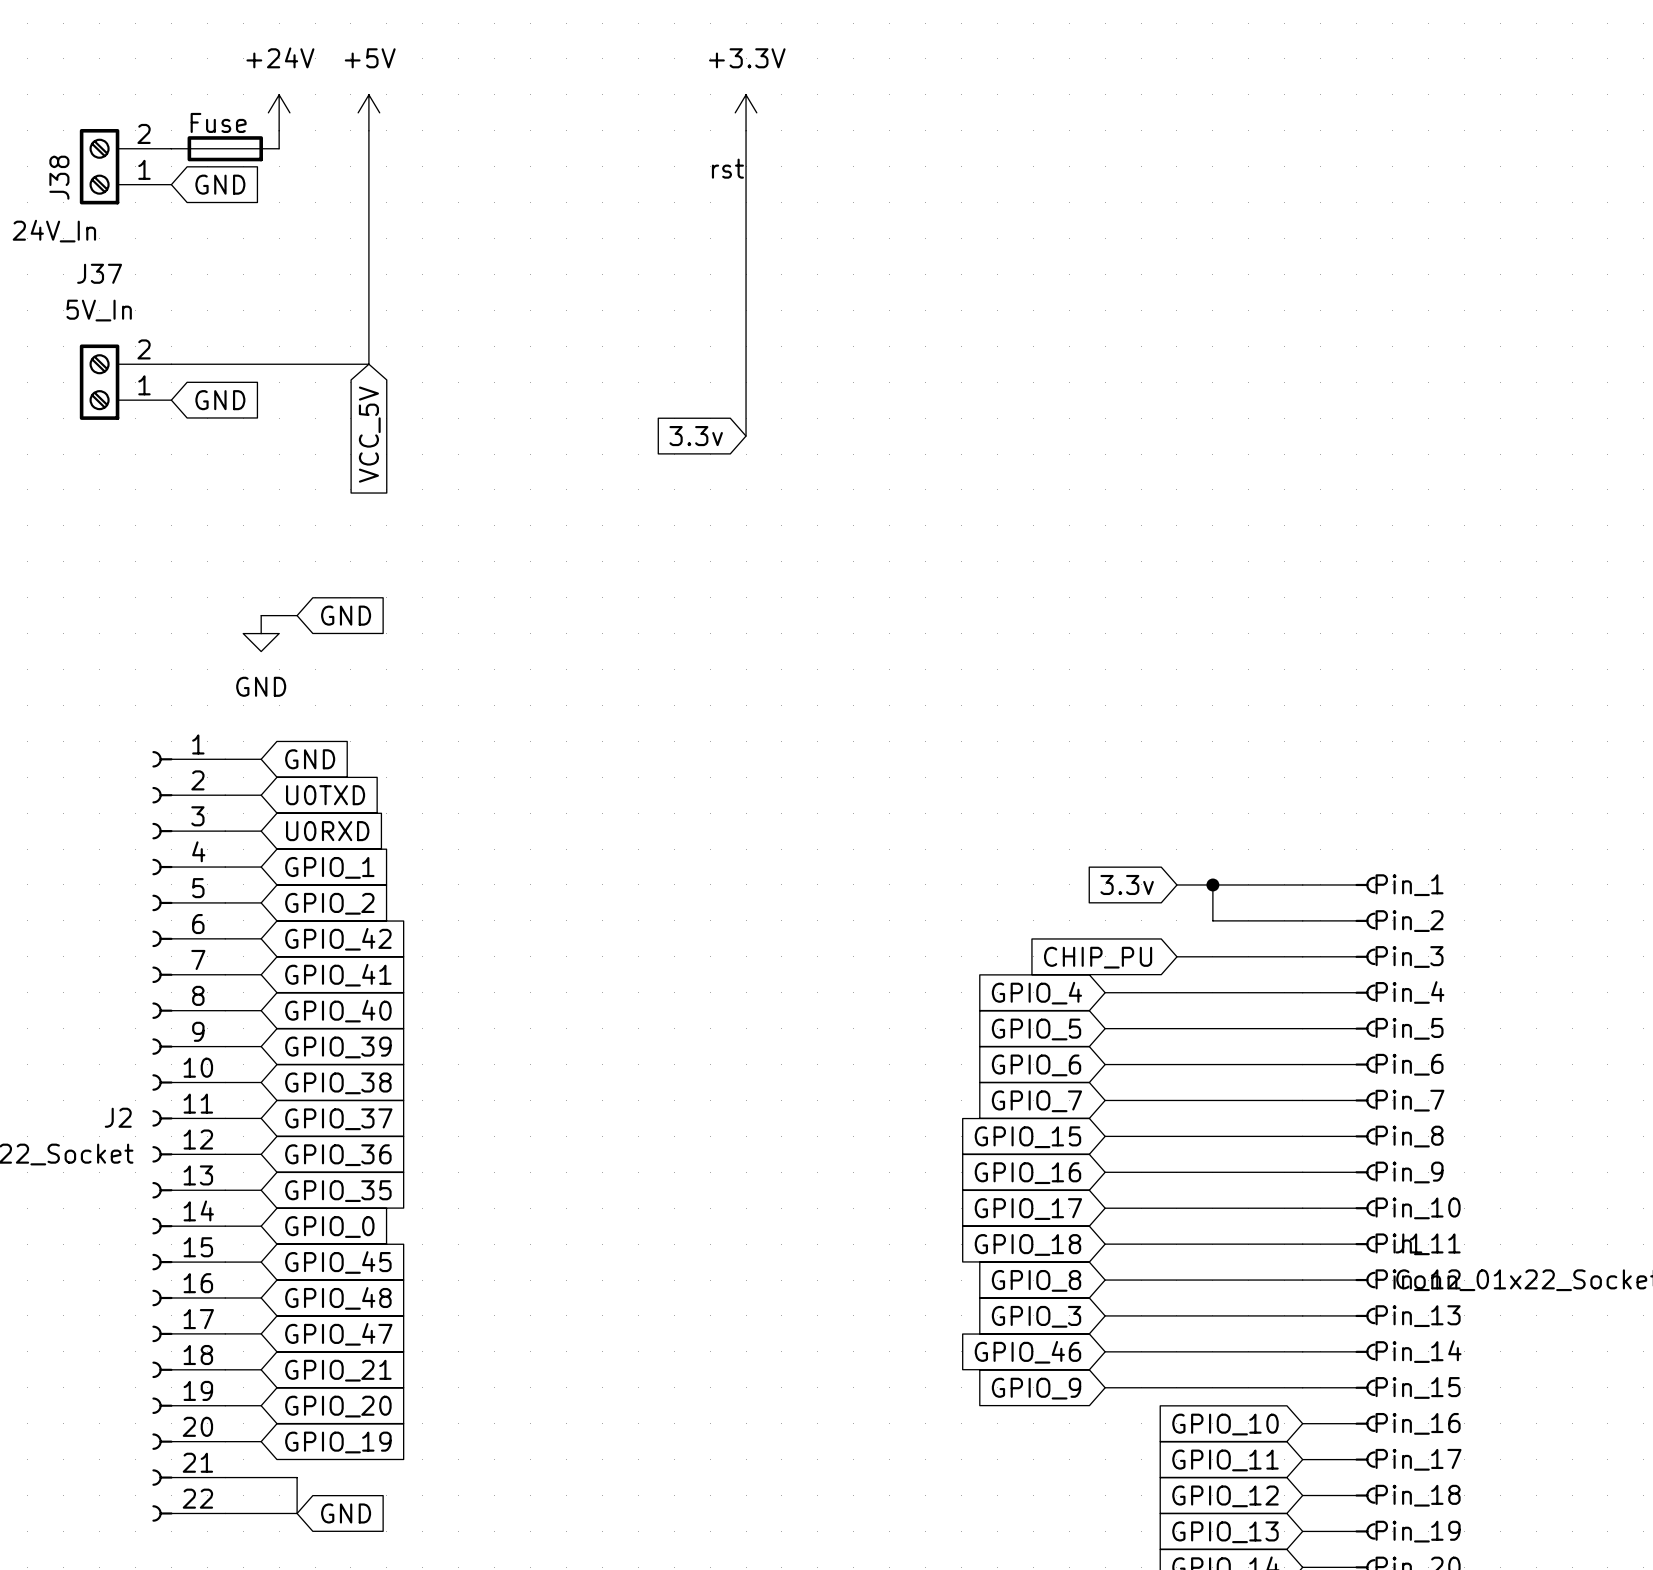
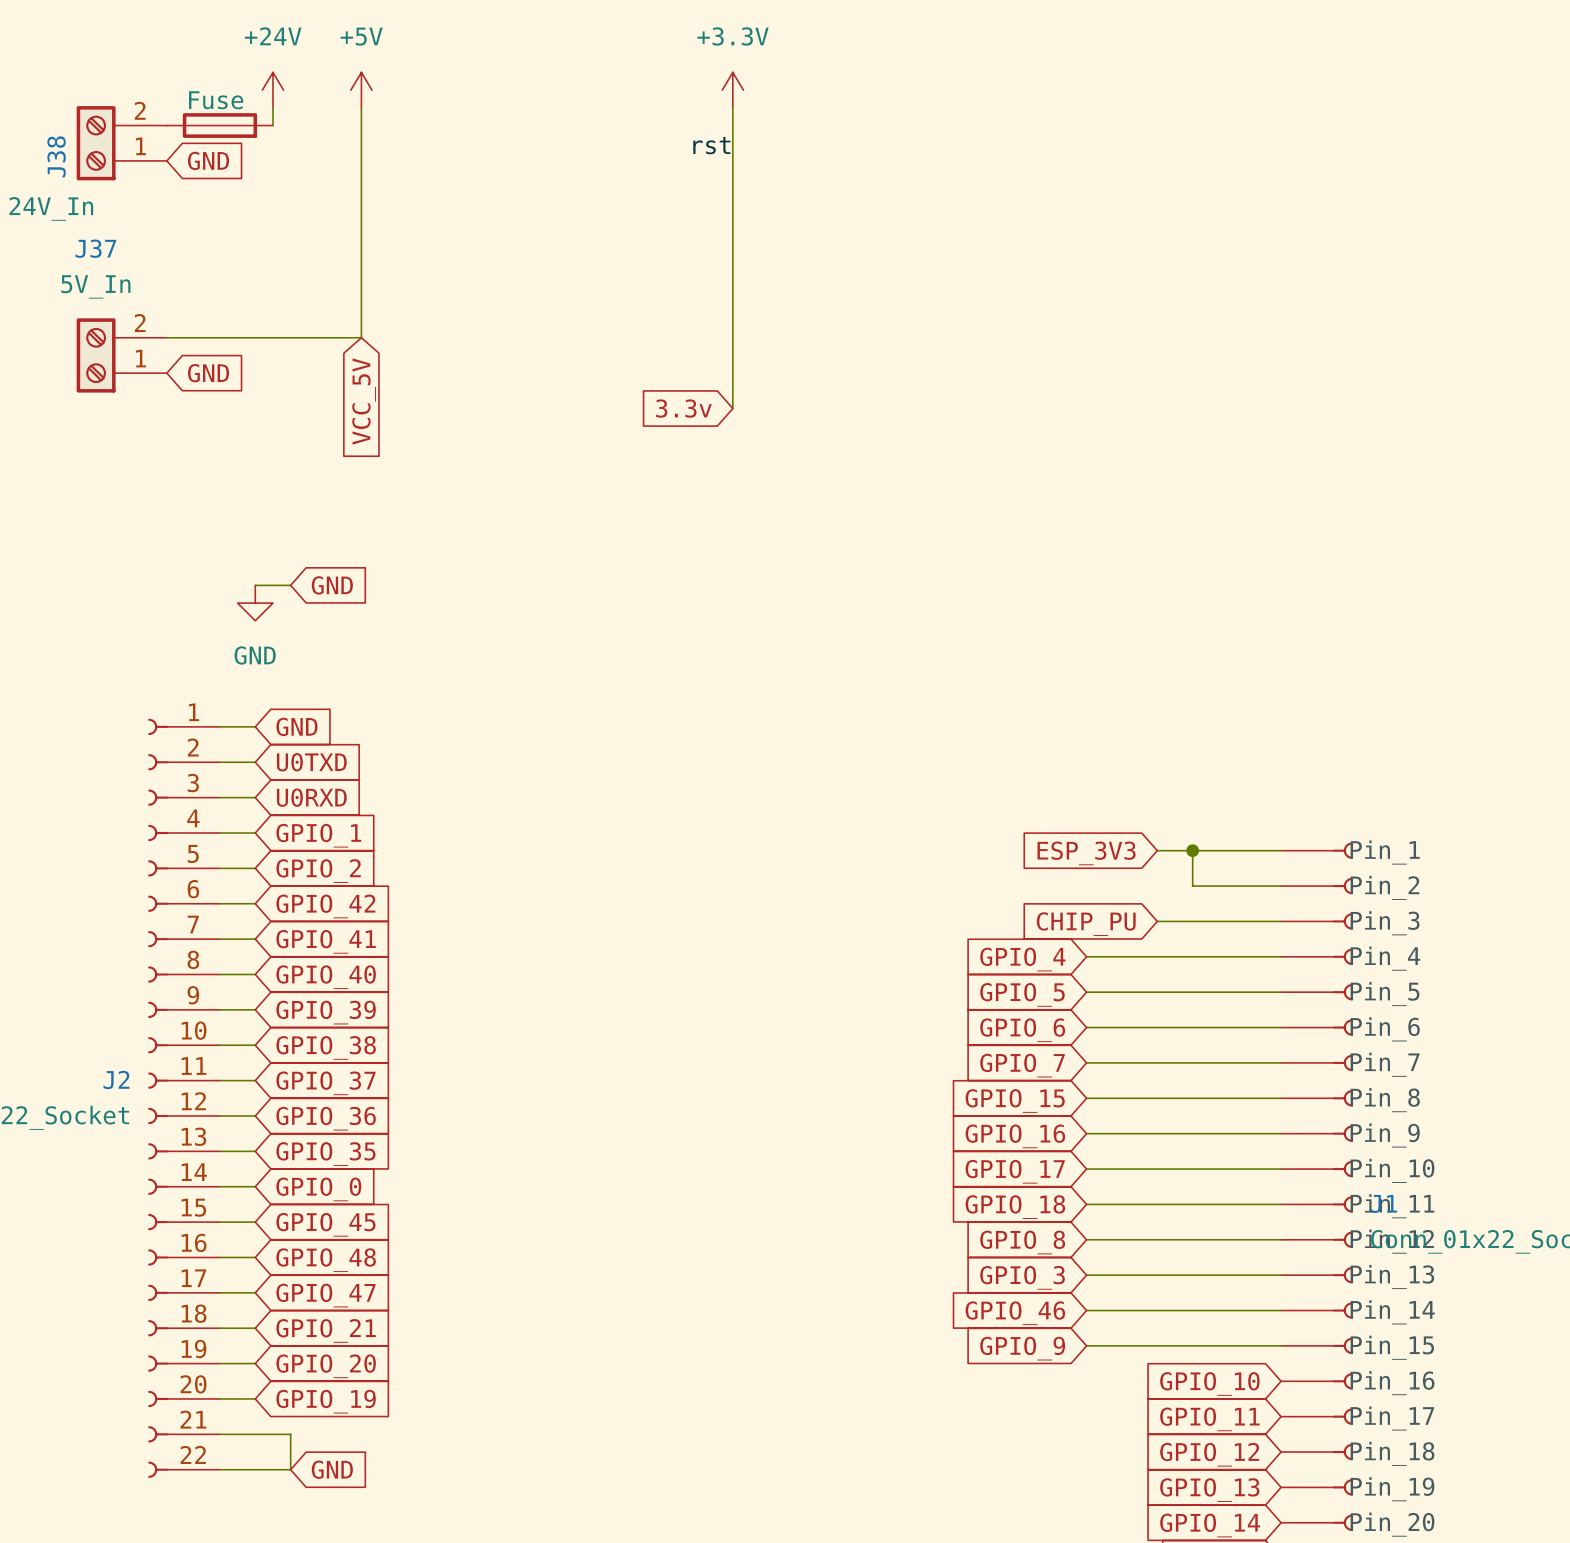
global label: 3.3v (1127, 884) -> ESP_3V3 (1086, 853)

